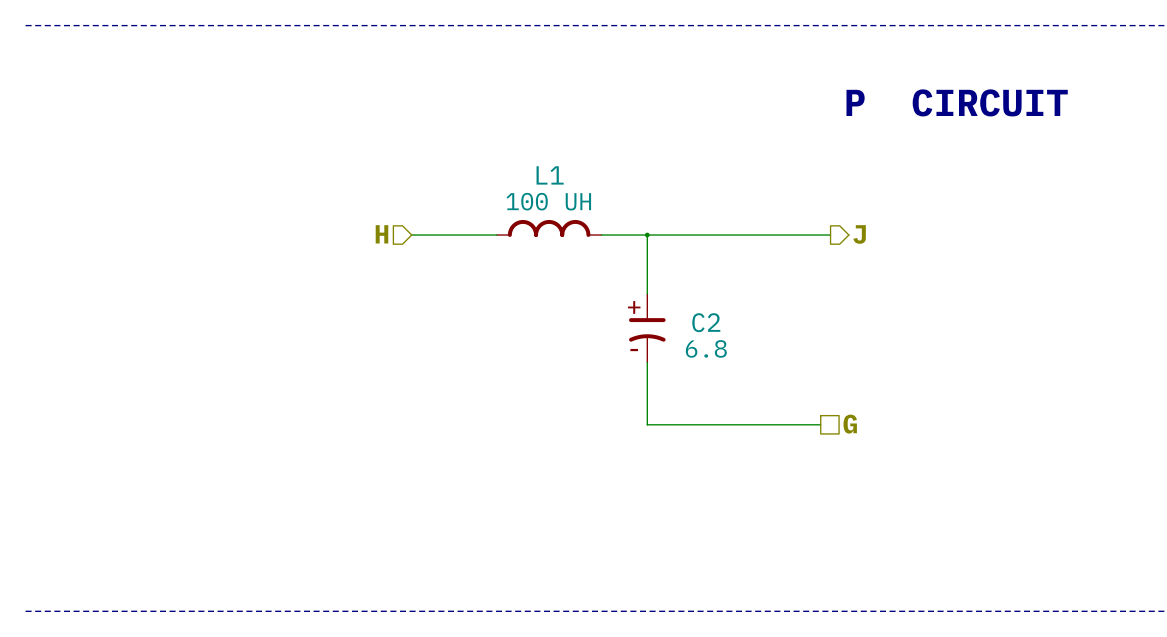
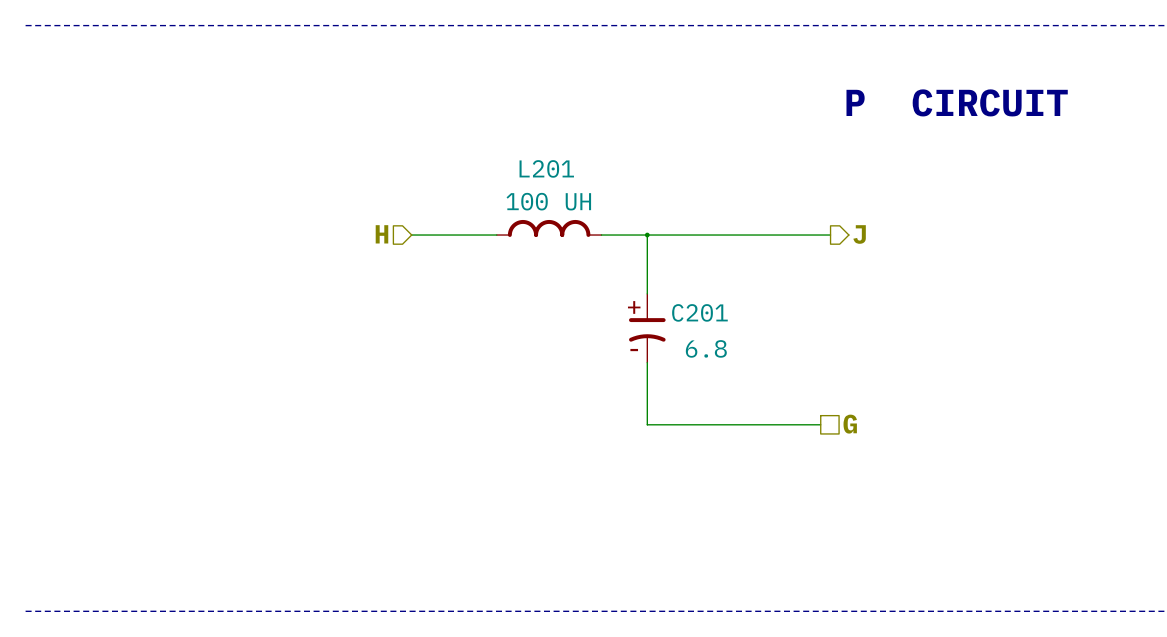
L201 name: none -> L201 (546, 168)
L201 text: L1 (550, 175) -> none
C201 name: none -> C201 (699, 312)
C201 text: C2 (706, 322) -> none

